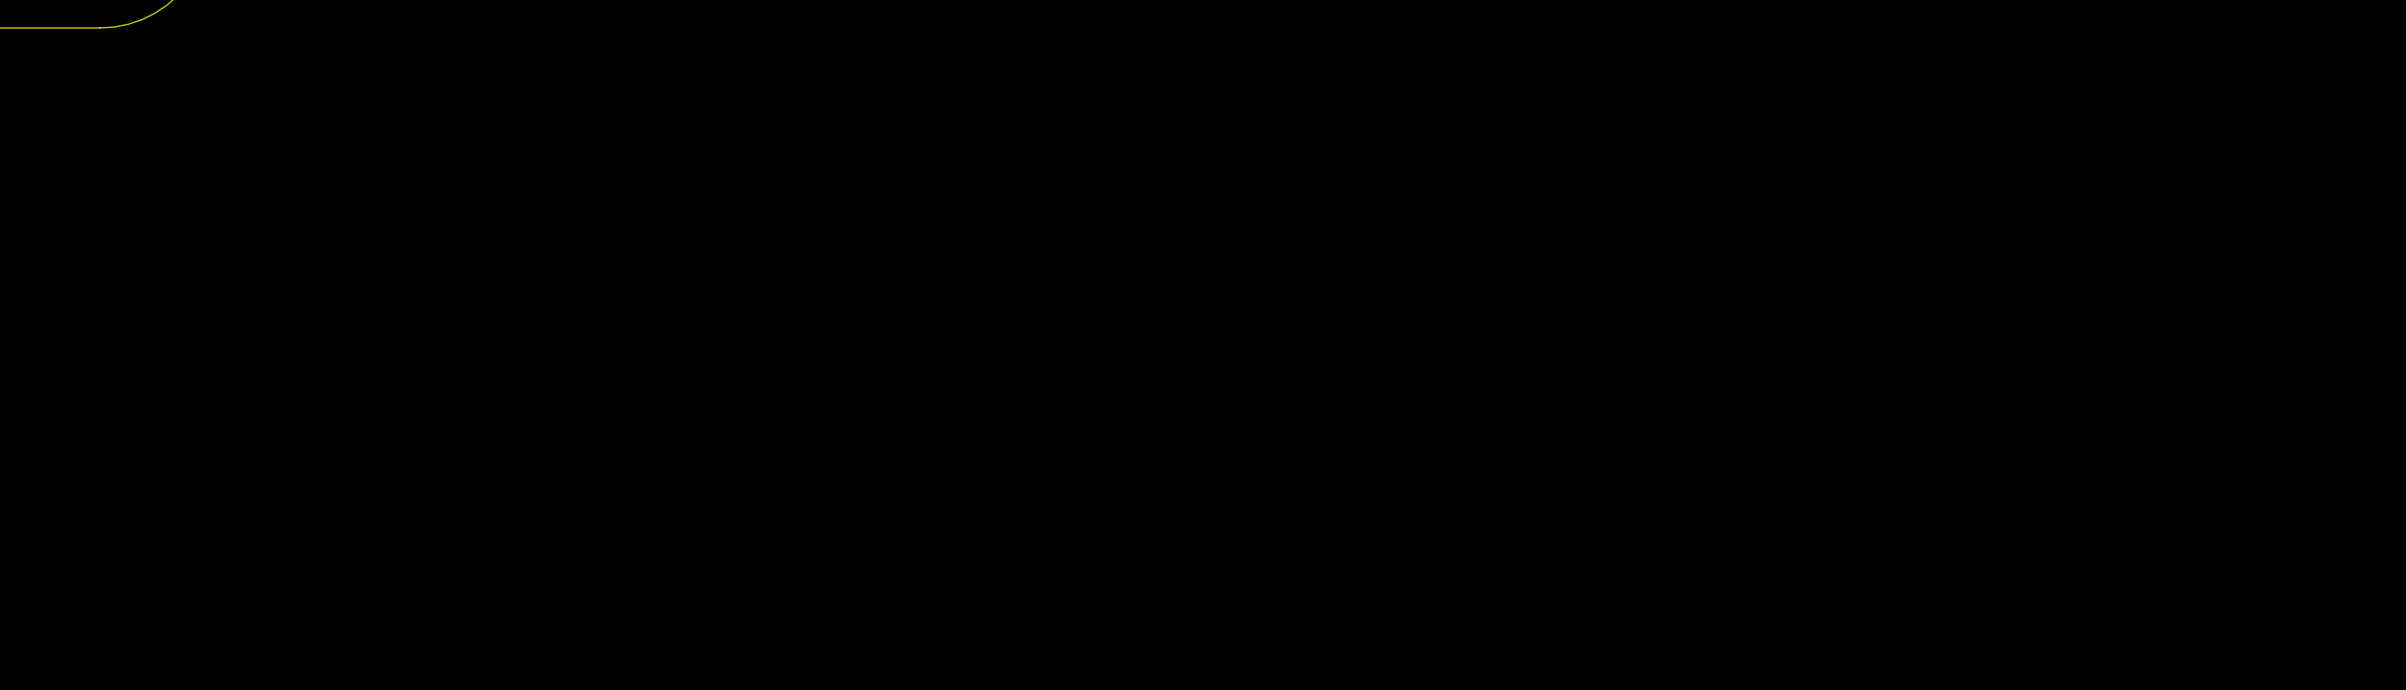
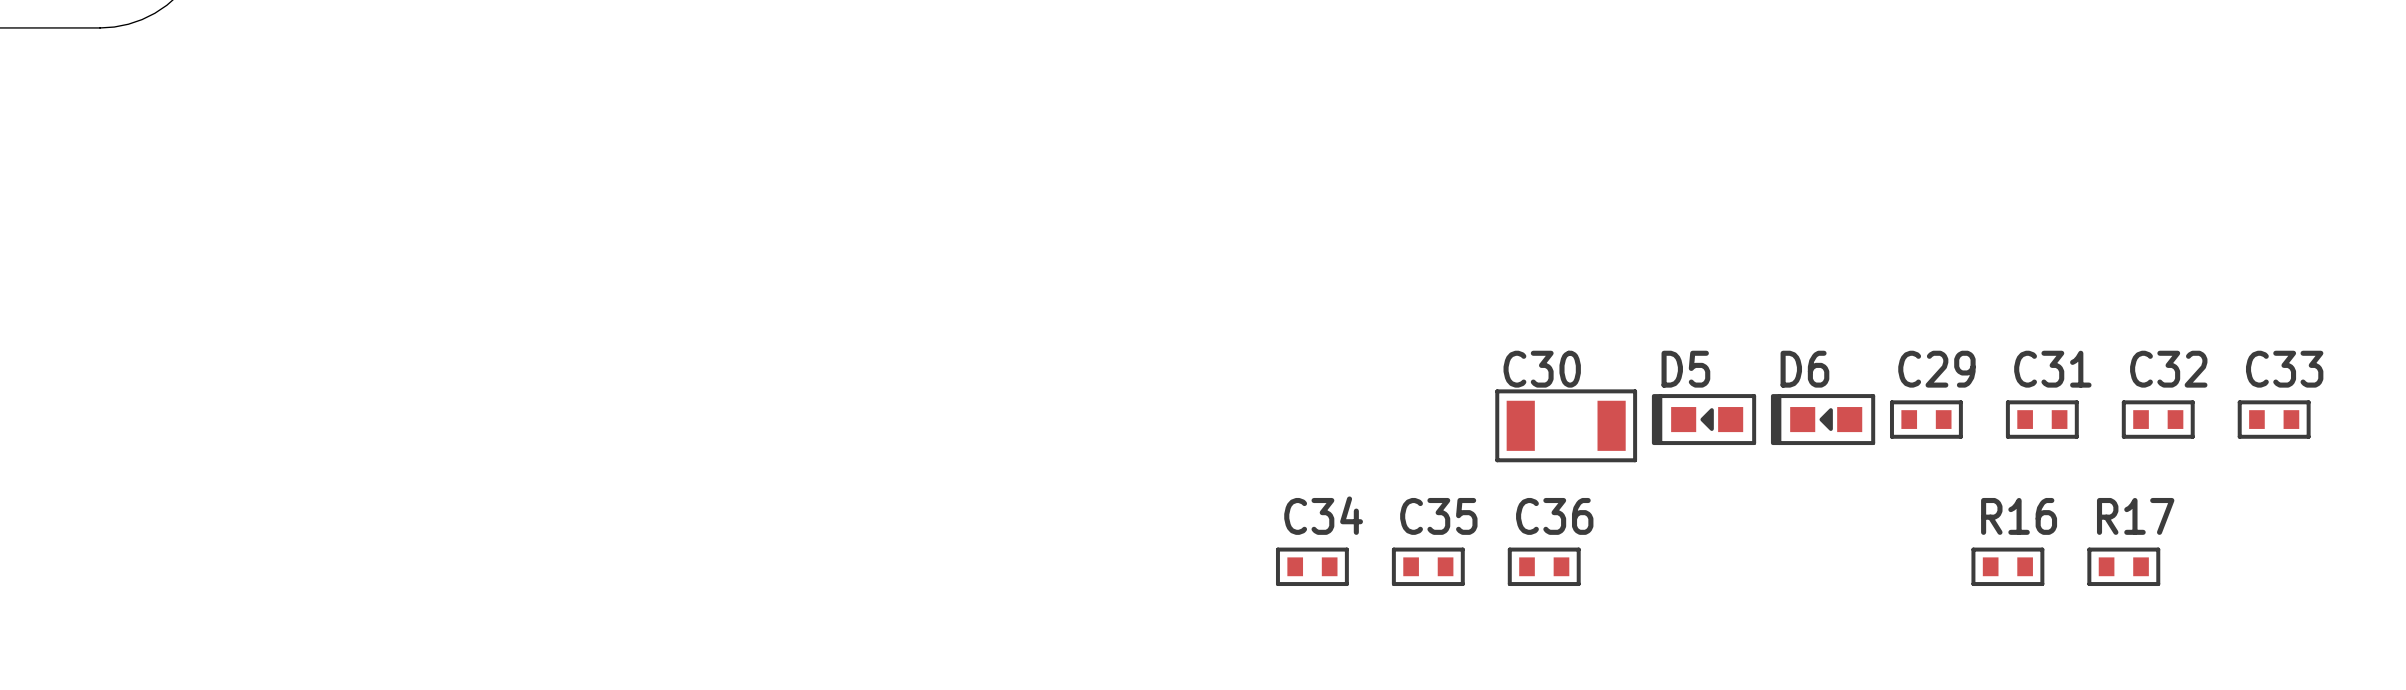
D5: none -> (1704, 419)
D6: none -> (1823, 419)
C29: none -> (1926, 419)
C31: none -> (2042, 419)
C32: none -> (2158, 419)
C33: none -> (2274, 419)
C30: none -> (1566, 425)
C34: none -> (1312, 566)
C35: none -> (1428, 566)
C36: none -> (1544, 566)
R16: none -> (2007, 566)
R17: none -> (2123, 566)

